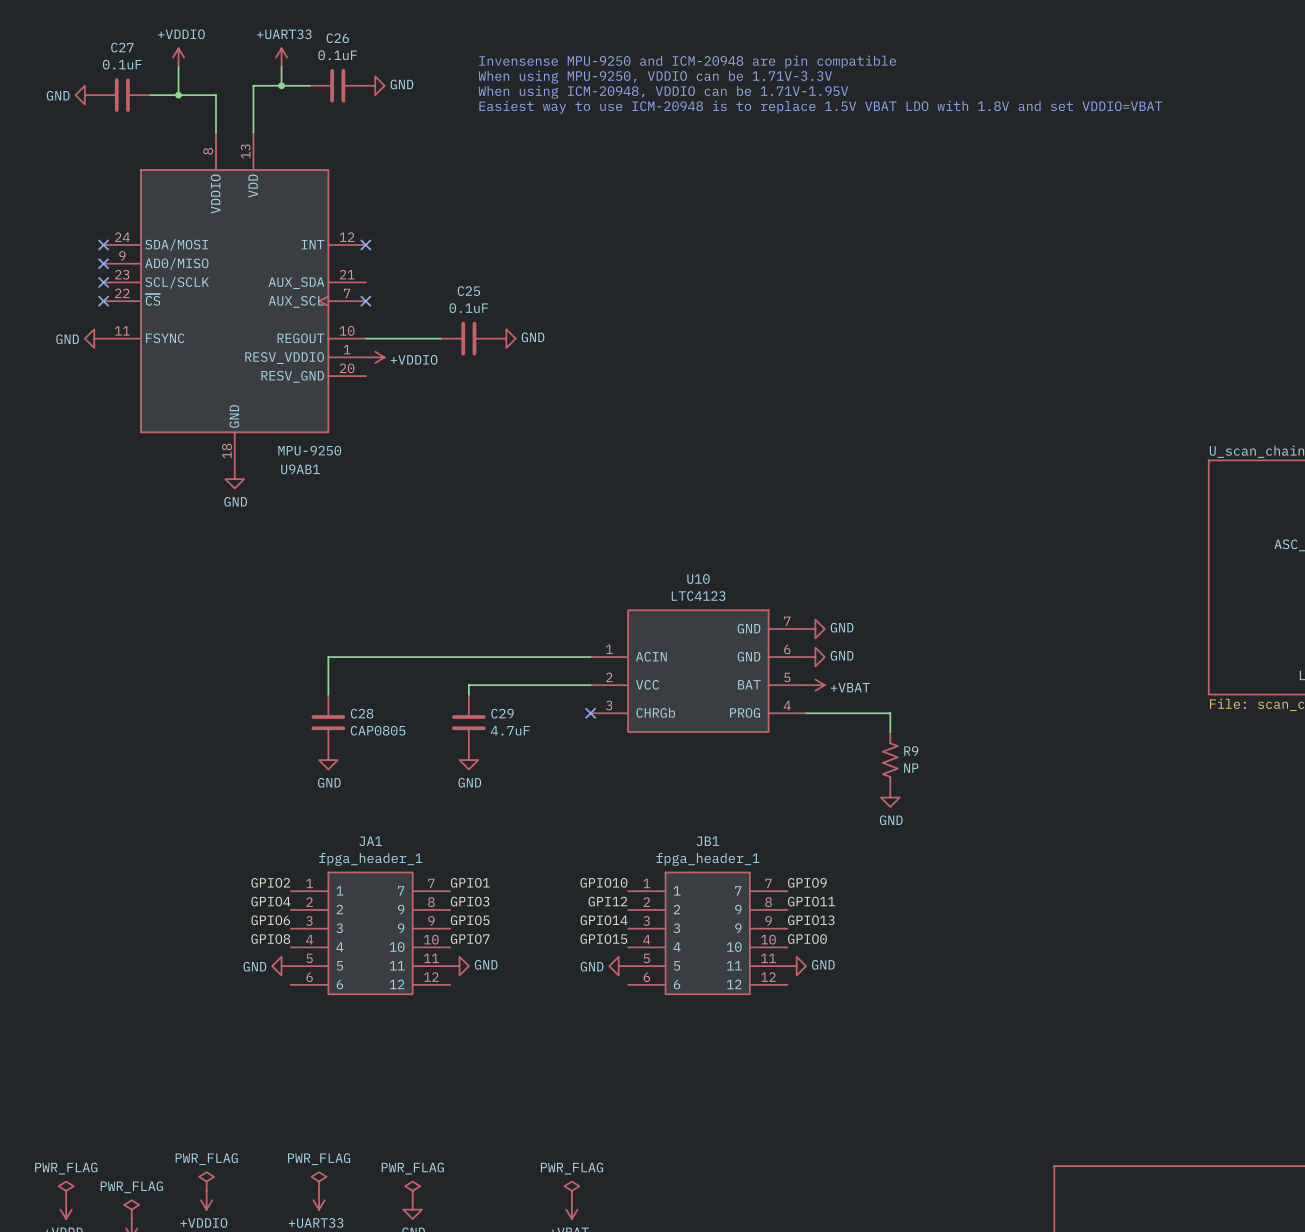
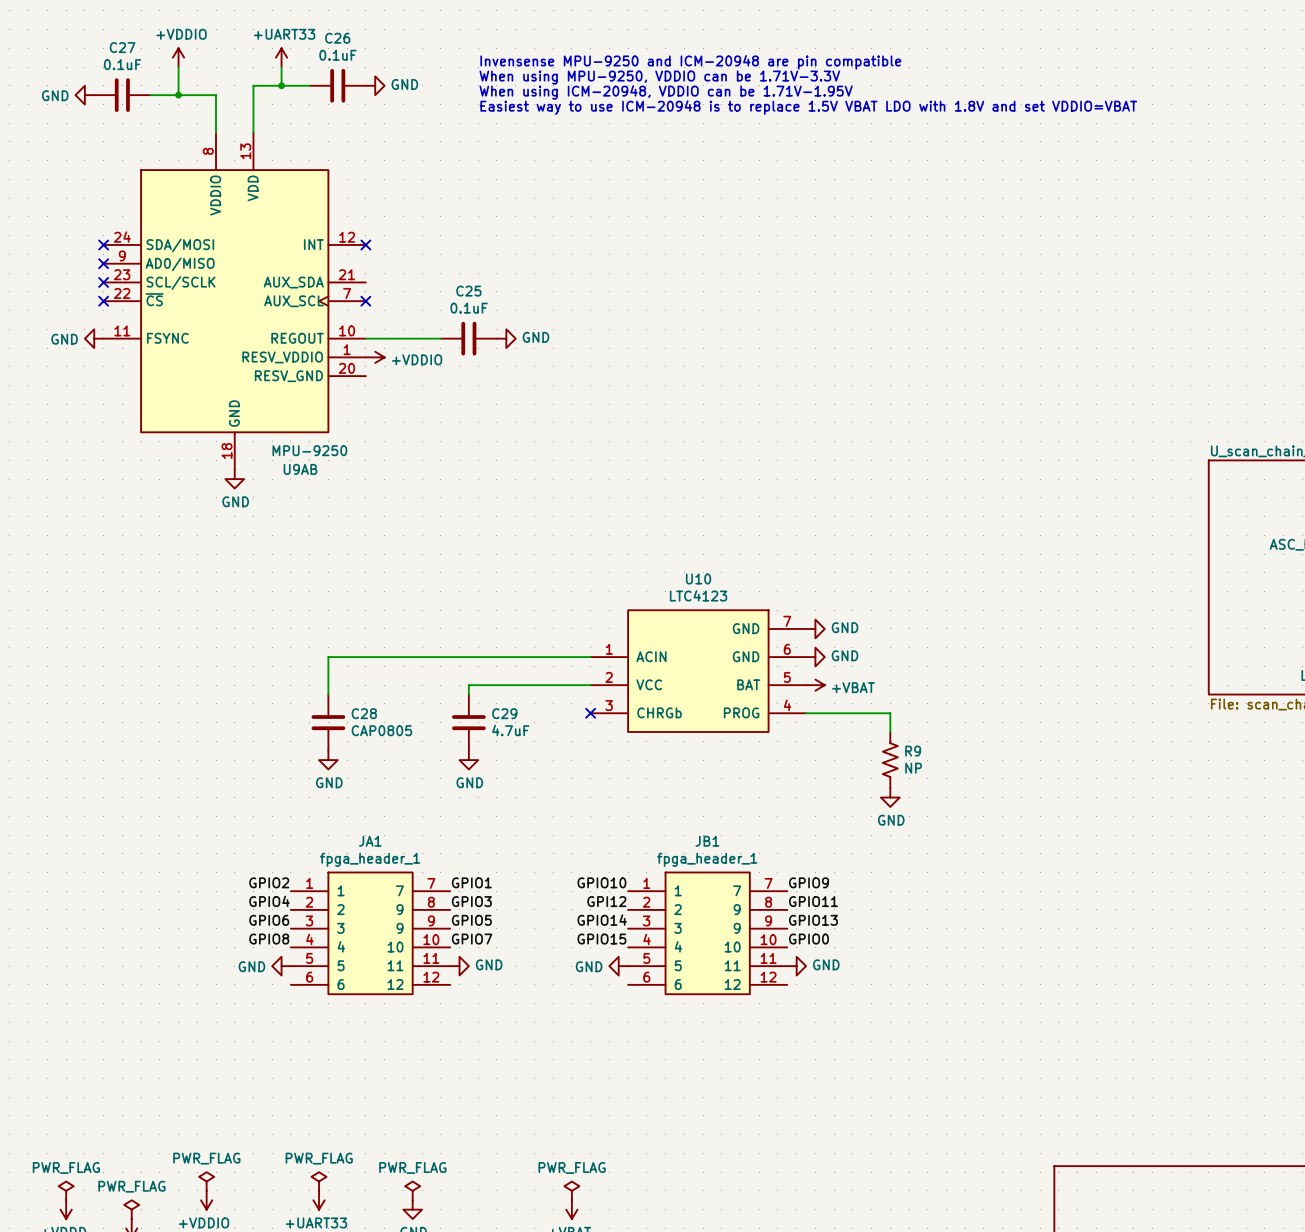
U9AB1 name: U9AB1 (300, 469) -> U9AB (300, 469)

